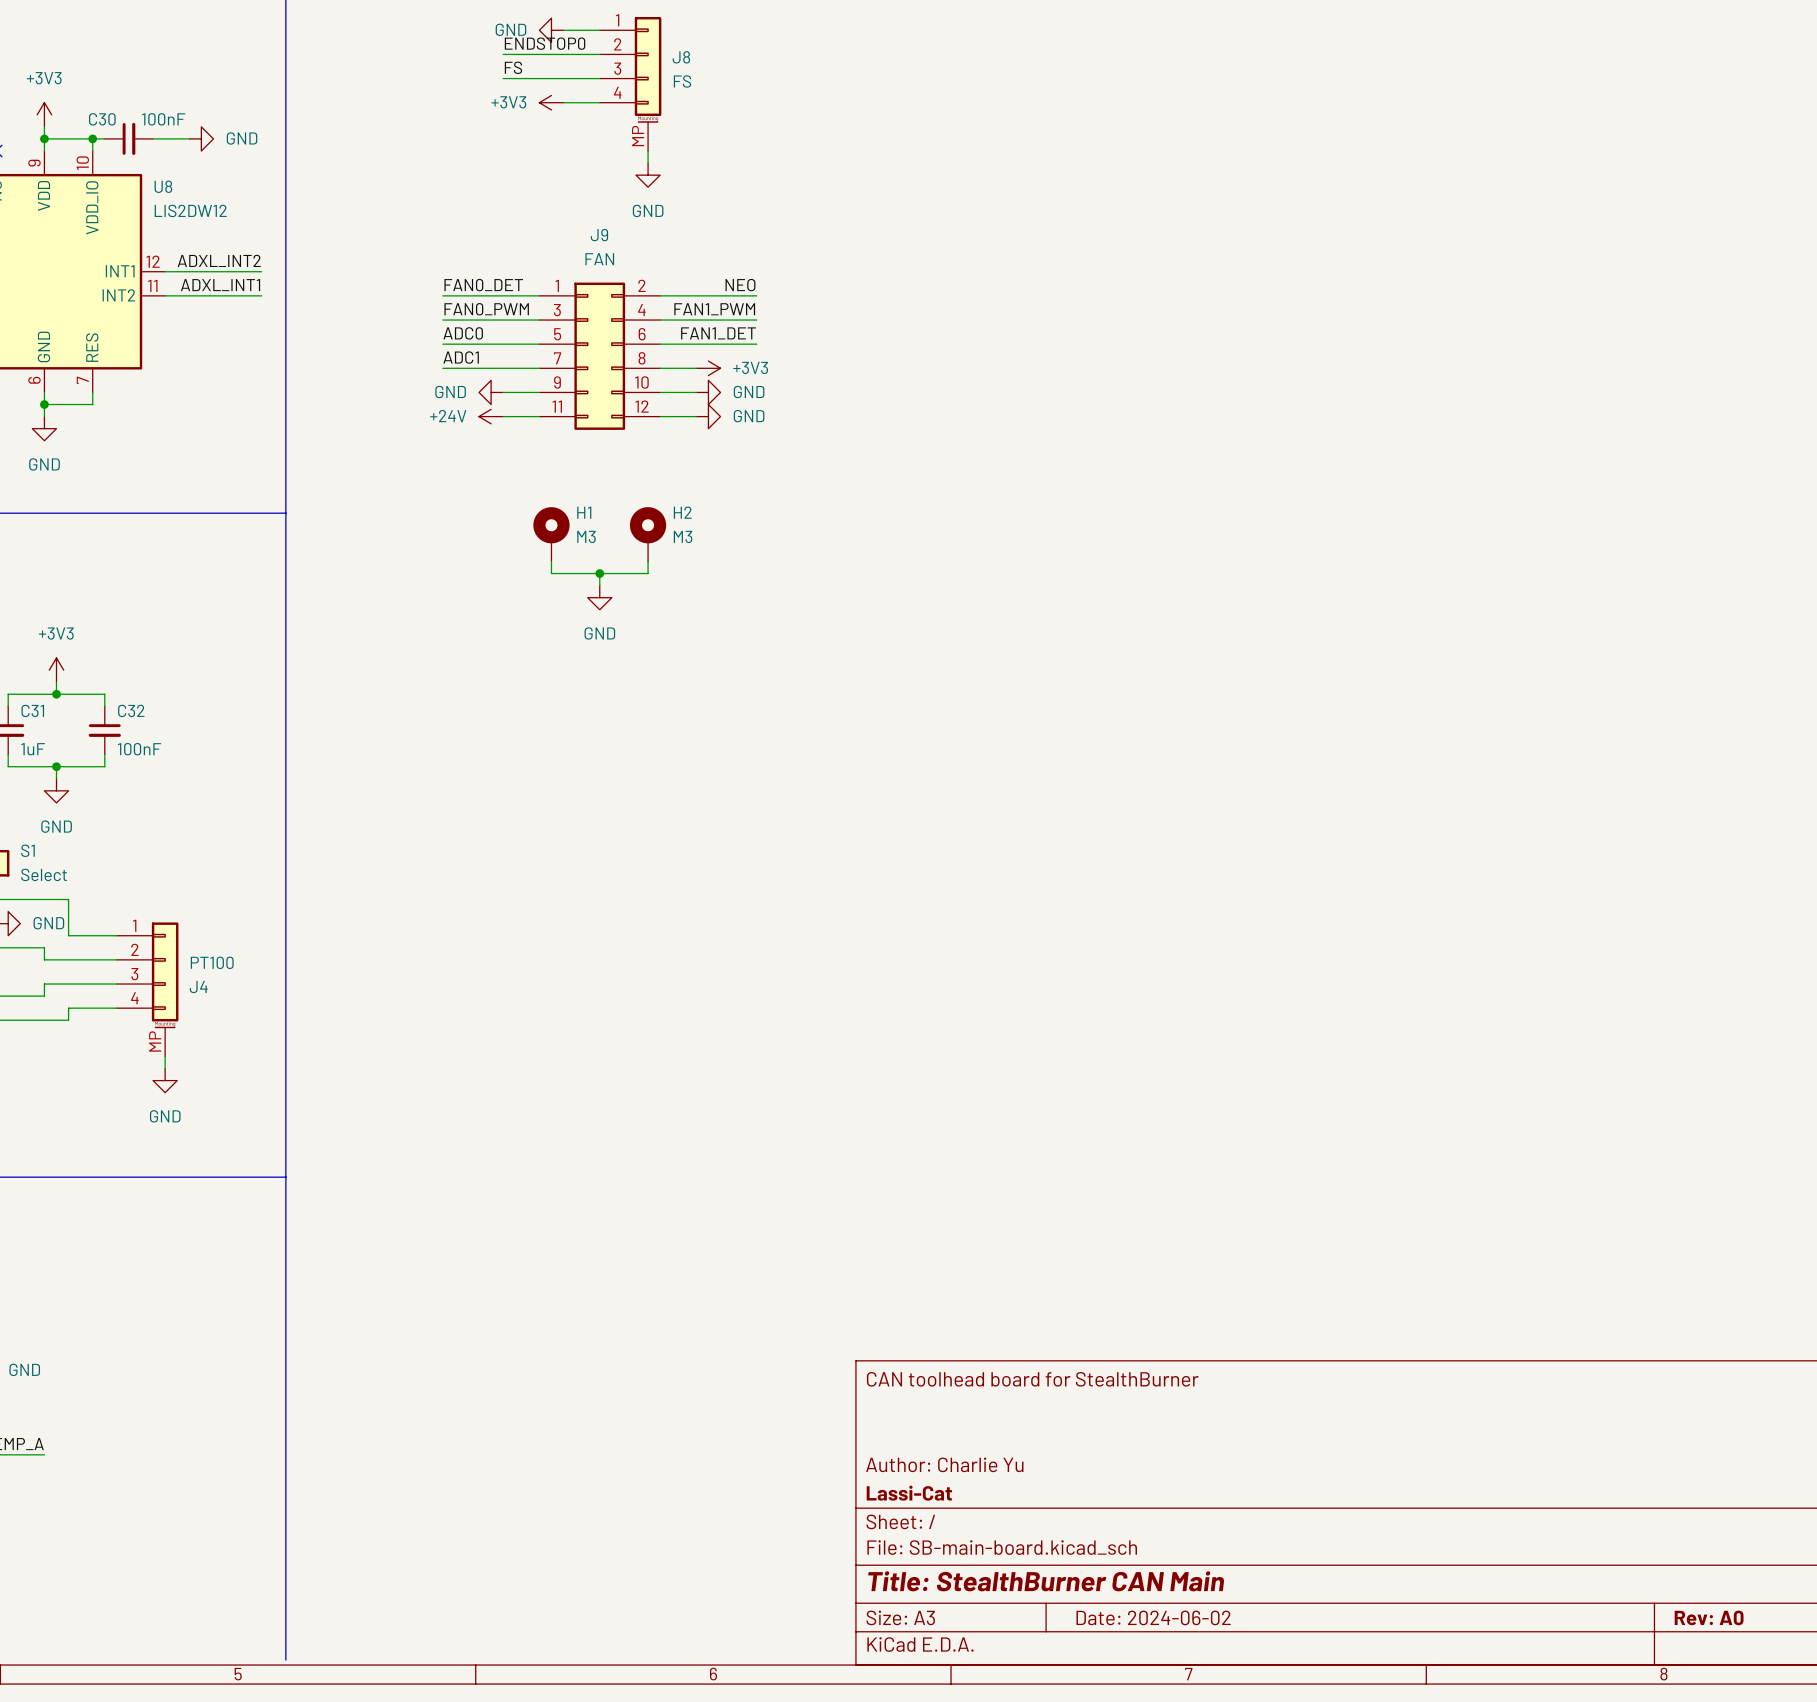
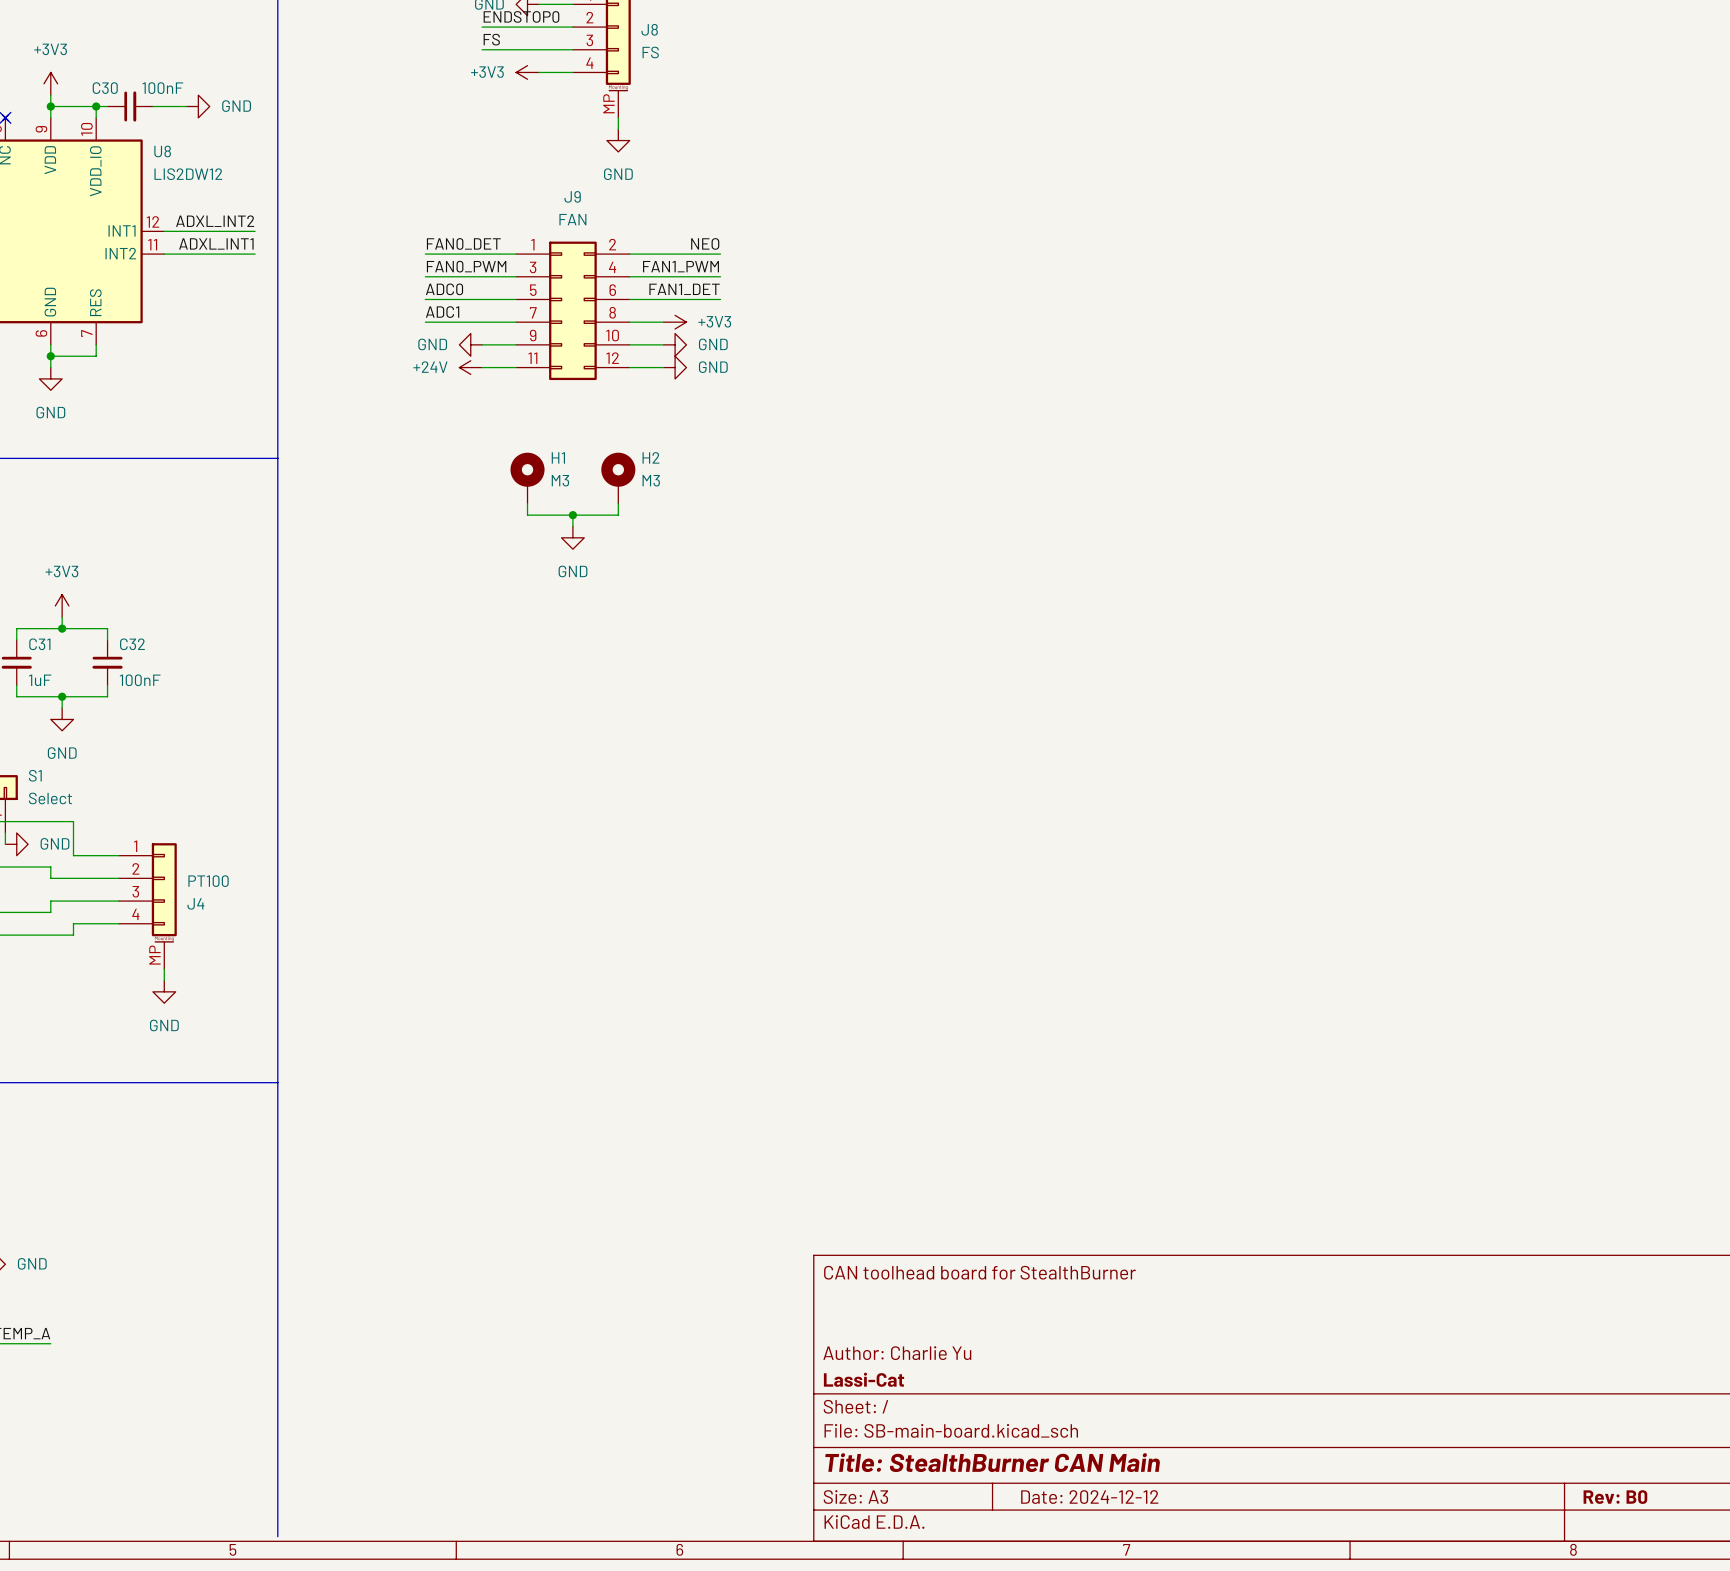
title block: Date: 2024-06-02 (1153, 1617) -> Date: 2024-12-12 (1089, 1497)
title block: Rev: A0 (1709, 1617) -> Rev: B0 (1615, 1497)

